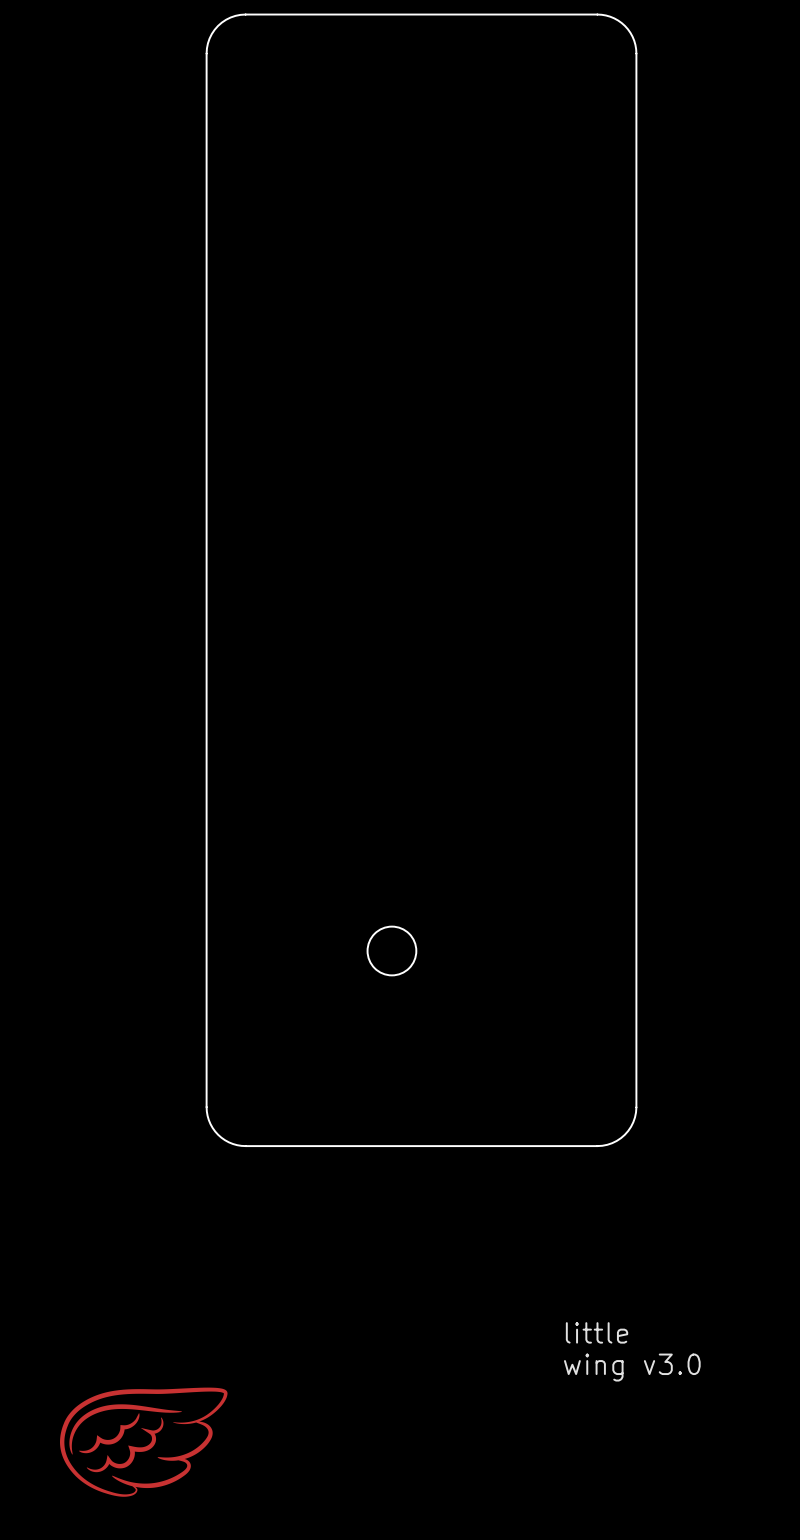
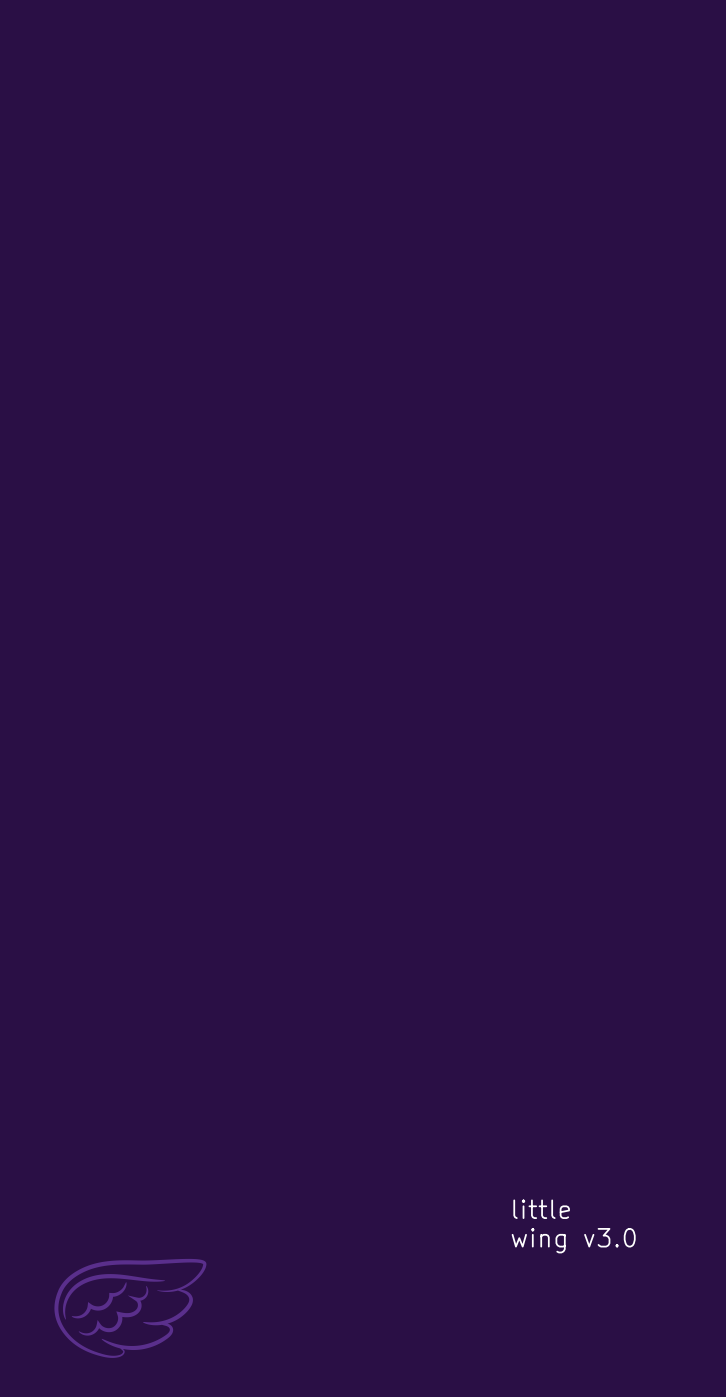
board edge: (245, 14) (601, 14) (621, 23) (634, 40) (636, 53) (636, 1107) (633, 1122) (628, 1130) (621, 1138) (607, 1144) (241, 1145) (221, 1137) (208, 1120) (206, 1107) (206, 53) (209, 38) (218, 25) (230, 17) (245, 14) -> none
round board edge: [367, 926, 417, 976] -> none

